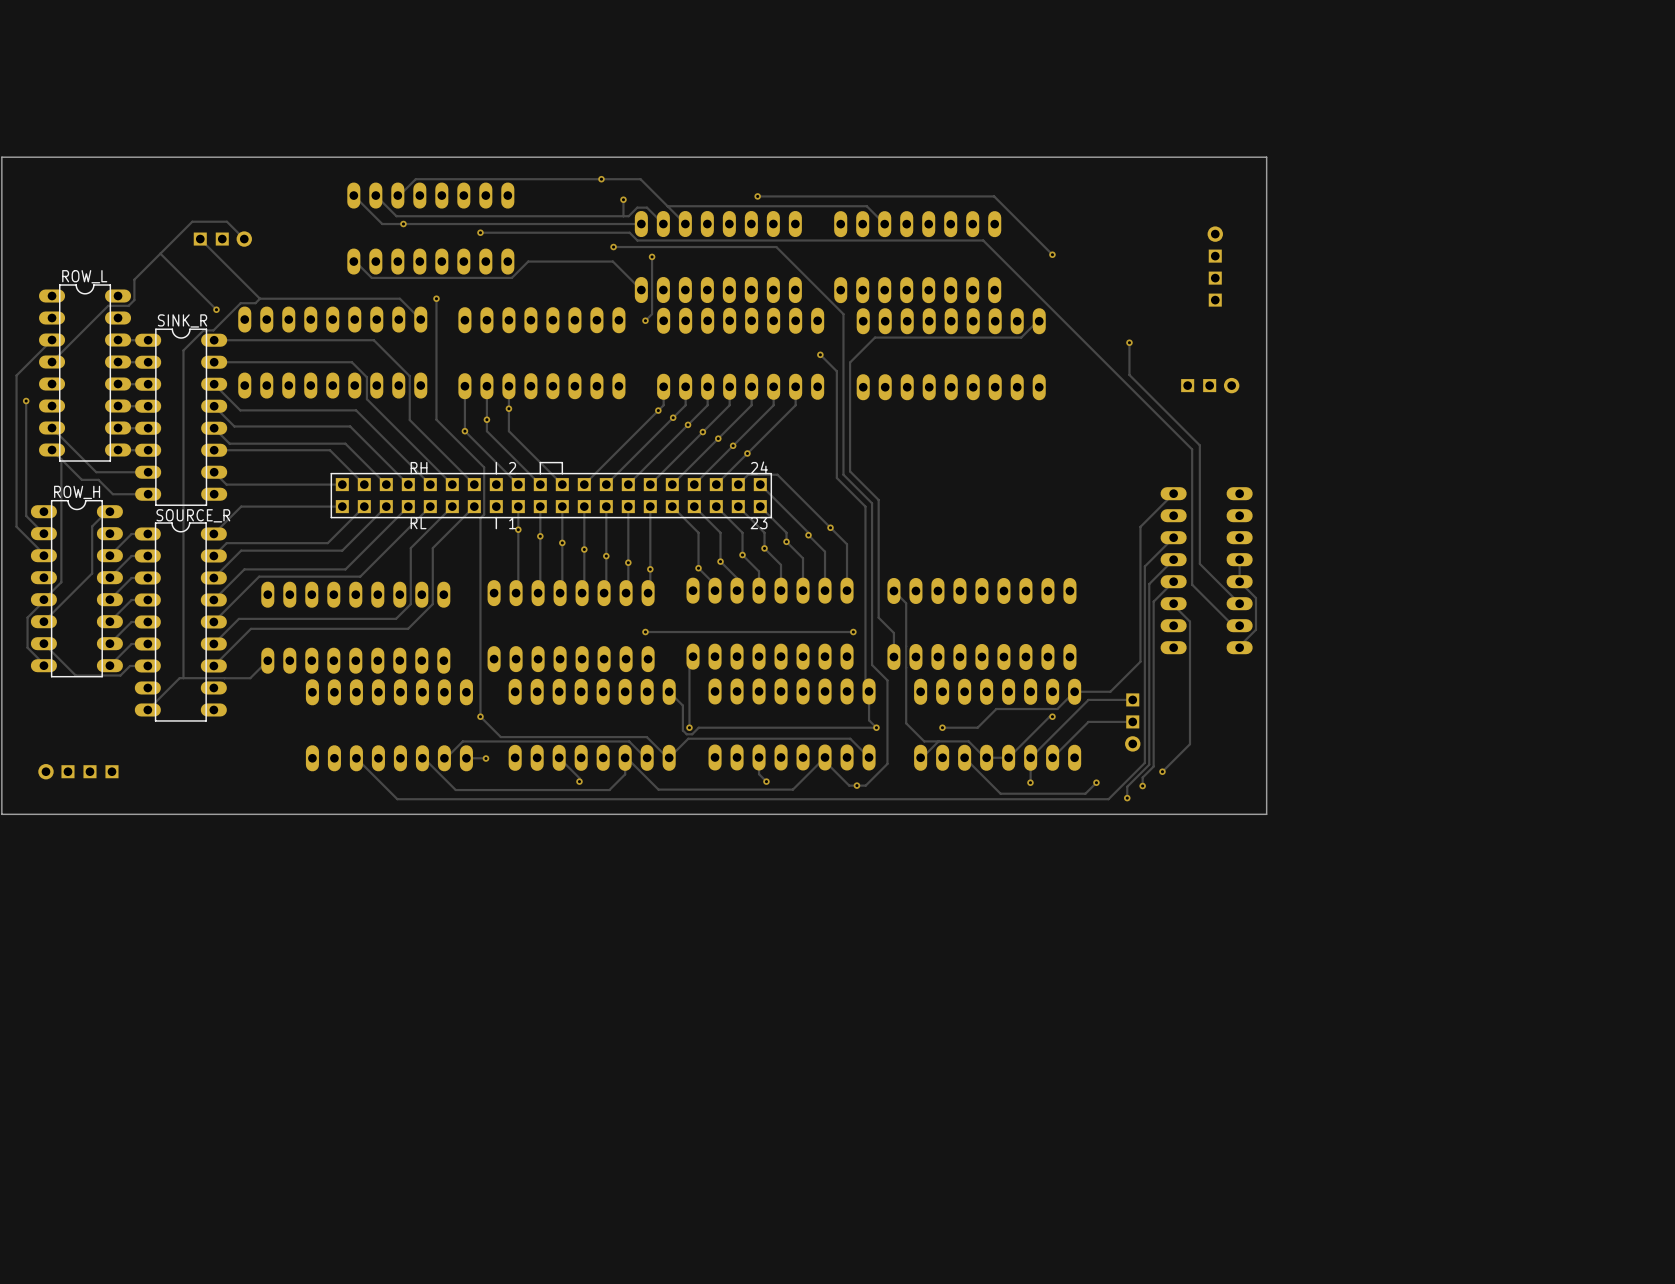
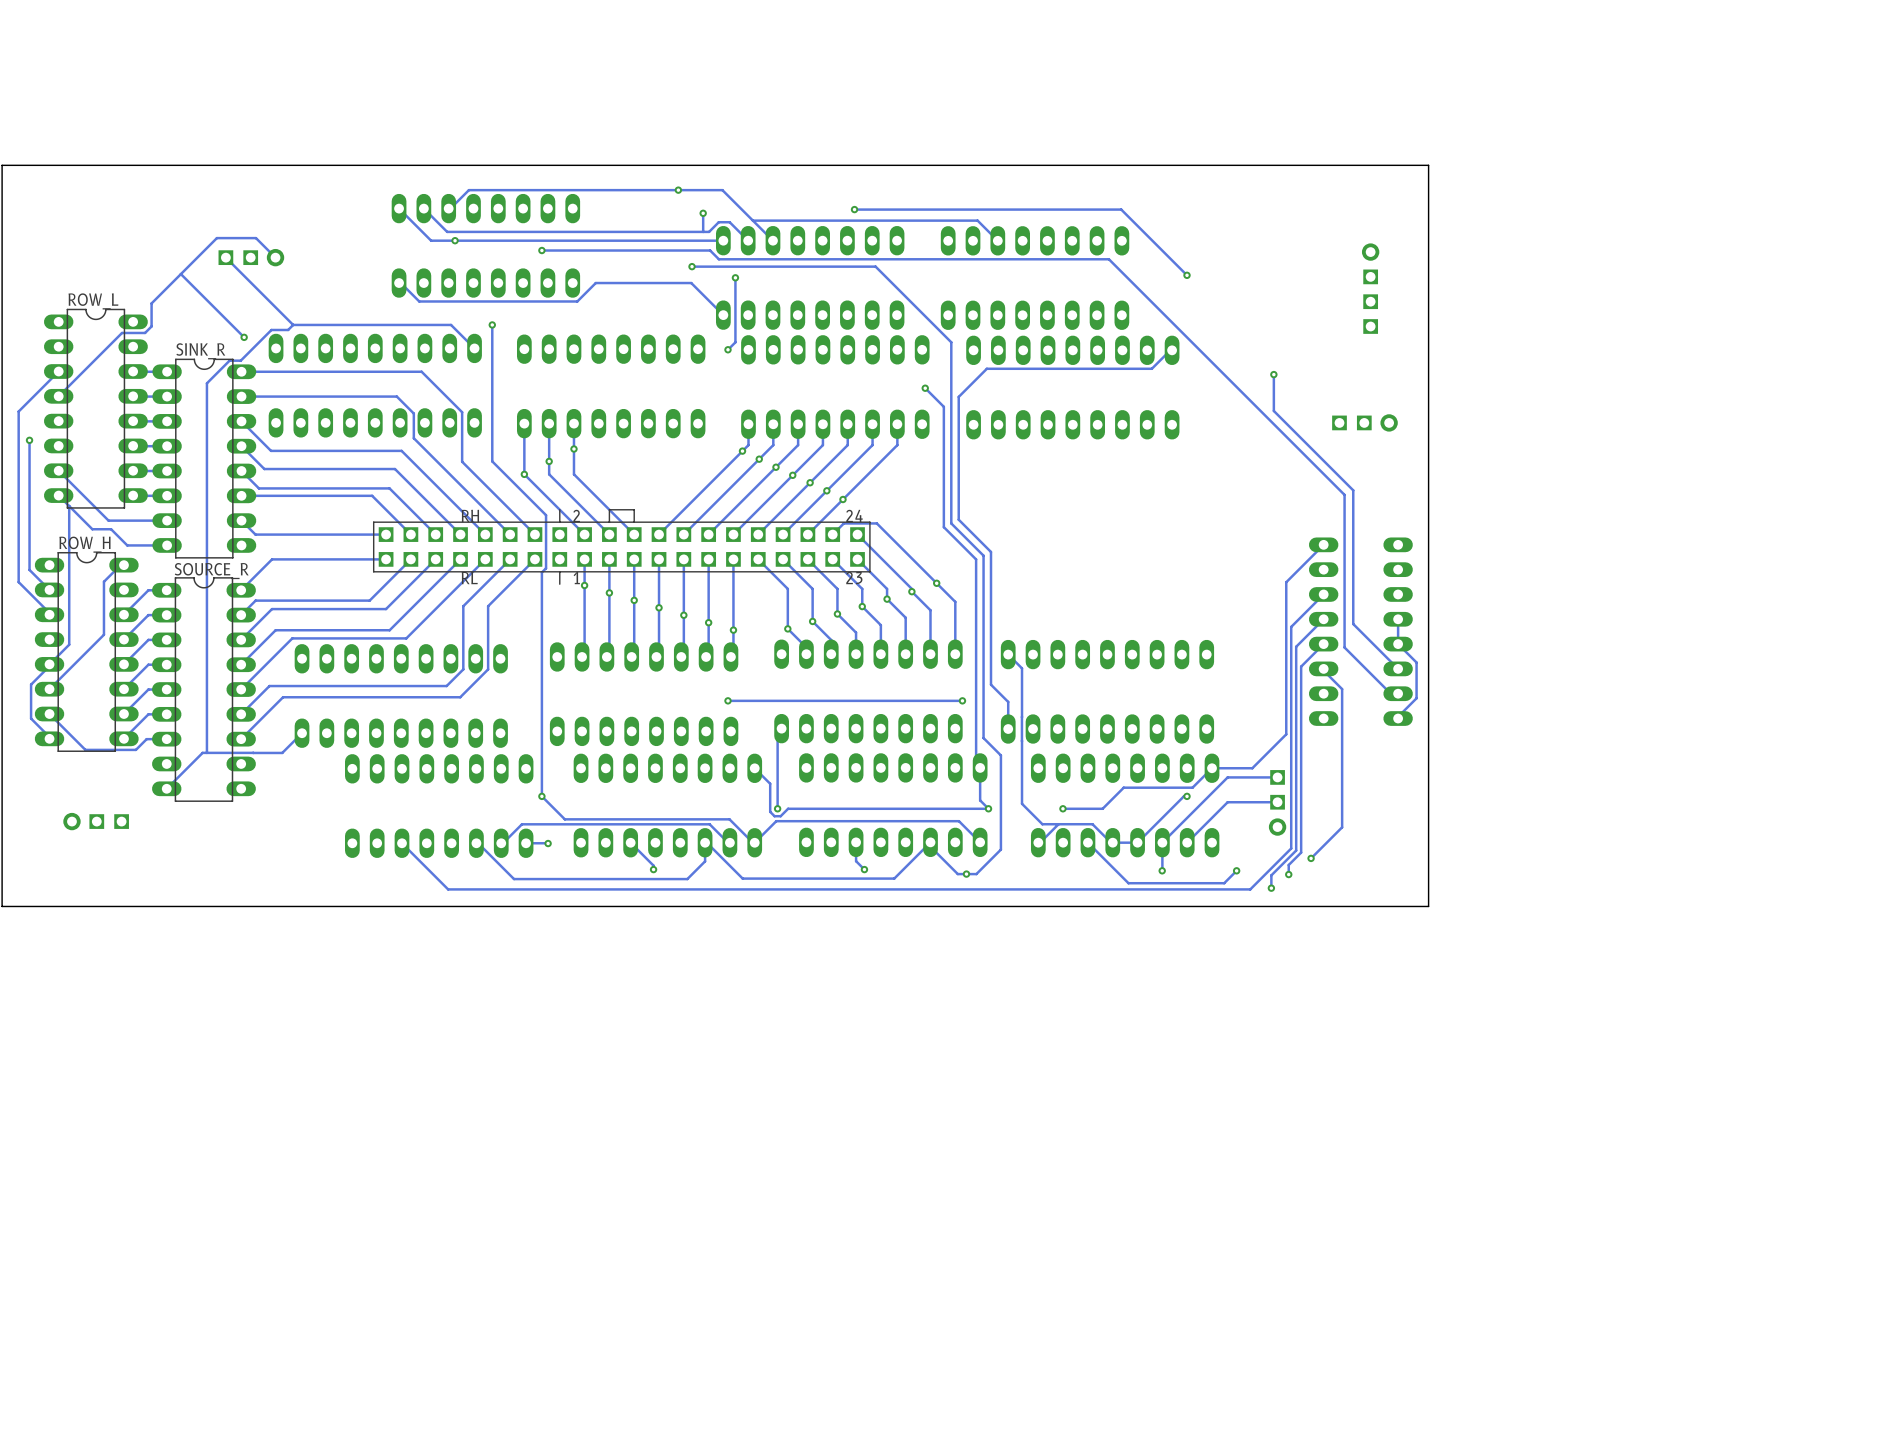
part: none -> (96, 821)
part: (78, 771) -> none

